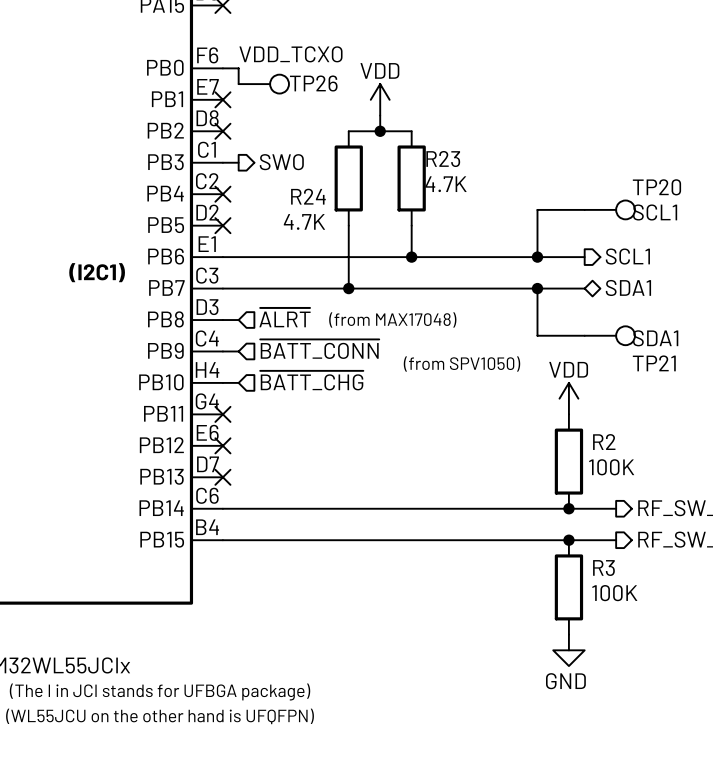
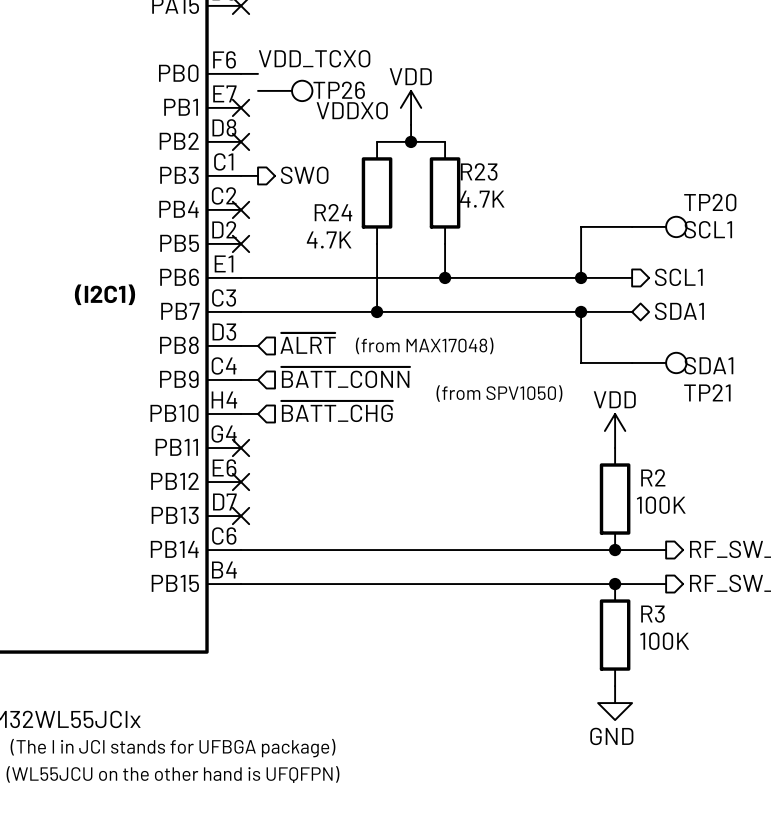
wire: (238, 68) (238, 84) -> none
TP26 value: none -> VDDXO (352, 110)

